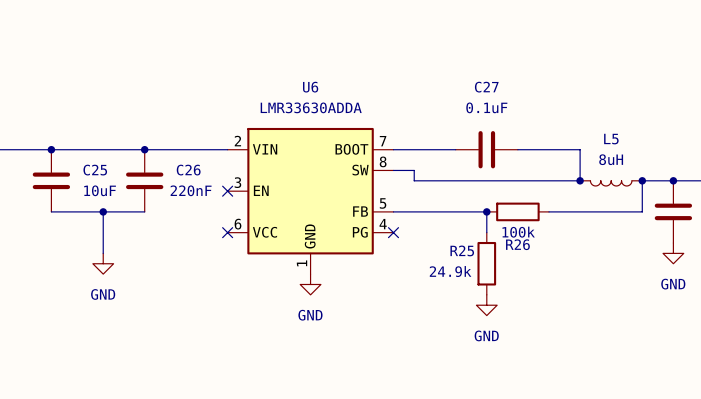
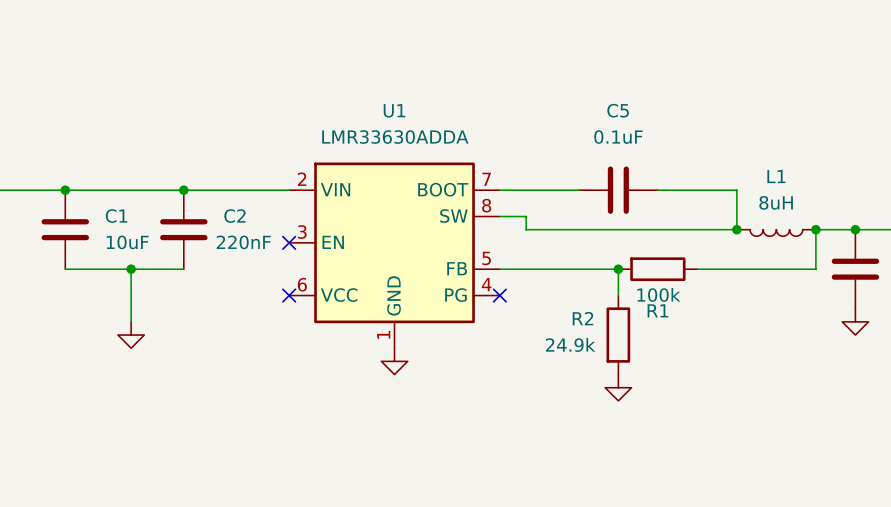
U6 name: U6 (310, 87) -> U1 (394, 110)
C27 name: C27 (486, 87) -> C5 (618, 110)
L5 name: L5 (611, 139) -> L1 (776, 176)
C25 name: C25 (95, 170) -> C1 (116, 216)
C26 name: C26 (188, 170) -> C2 (234, 216)
R26 name: R26 (517, 244) -> R1 (657, 310)
R25 name: R25 (462, 250) -> R2 (582, 318)
power symbol text: GND (673, 284) -> none
power symbol text: GND (103, 294) -> none
power symbol text: GND (310, 315) -> none
power symbol text: GND (486, 335) -> none

